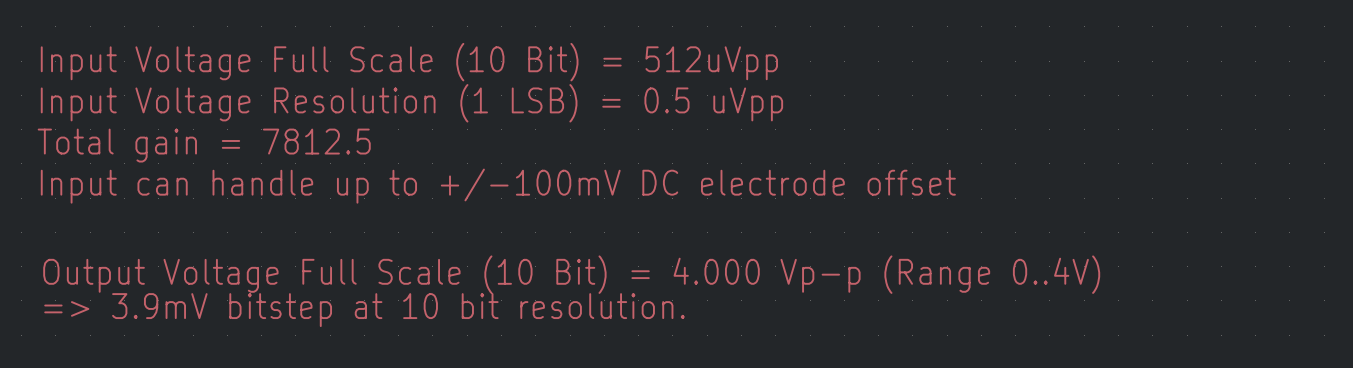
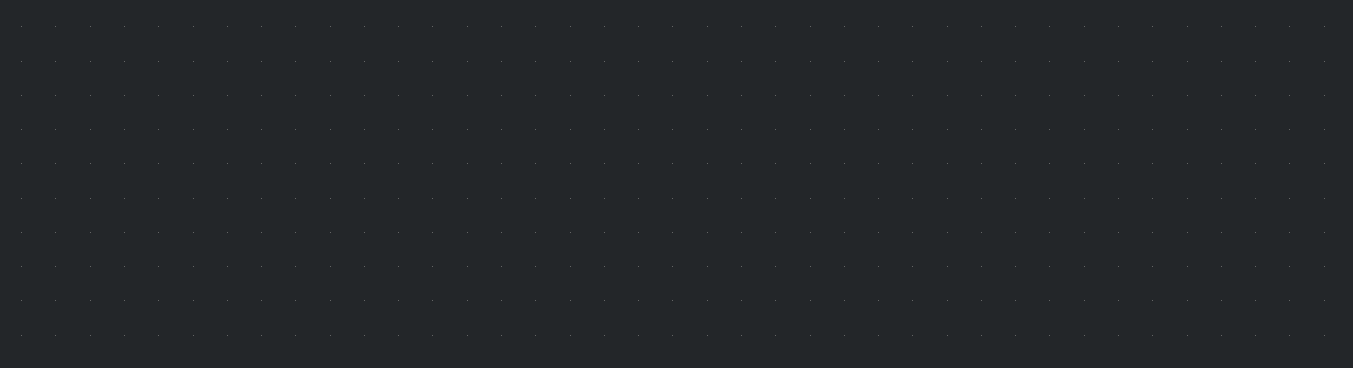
text: Input Voltage Full Scale (10 Bit) = 512uVpp (409, 62) -> none
text: Input Voltage Resolution (1 LSB) = 0.5 uVpp (411, 103) -> none
text: Total gain = 7812.5 (204, 145) -> none
text: Input can handle up to +/-100mV DC electrode offset (498, 186) -> none
text: Output Voltage Full Scale (10 Bit) = 4.000 Vp-p (Range 0..4V) (571, 274) -> none
text: => 3.9mV bitstep at 10 bit resolution. (364, 310) -> none

